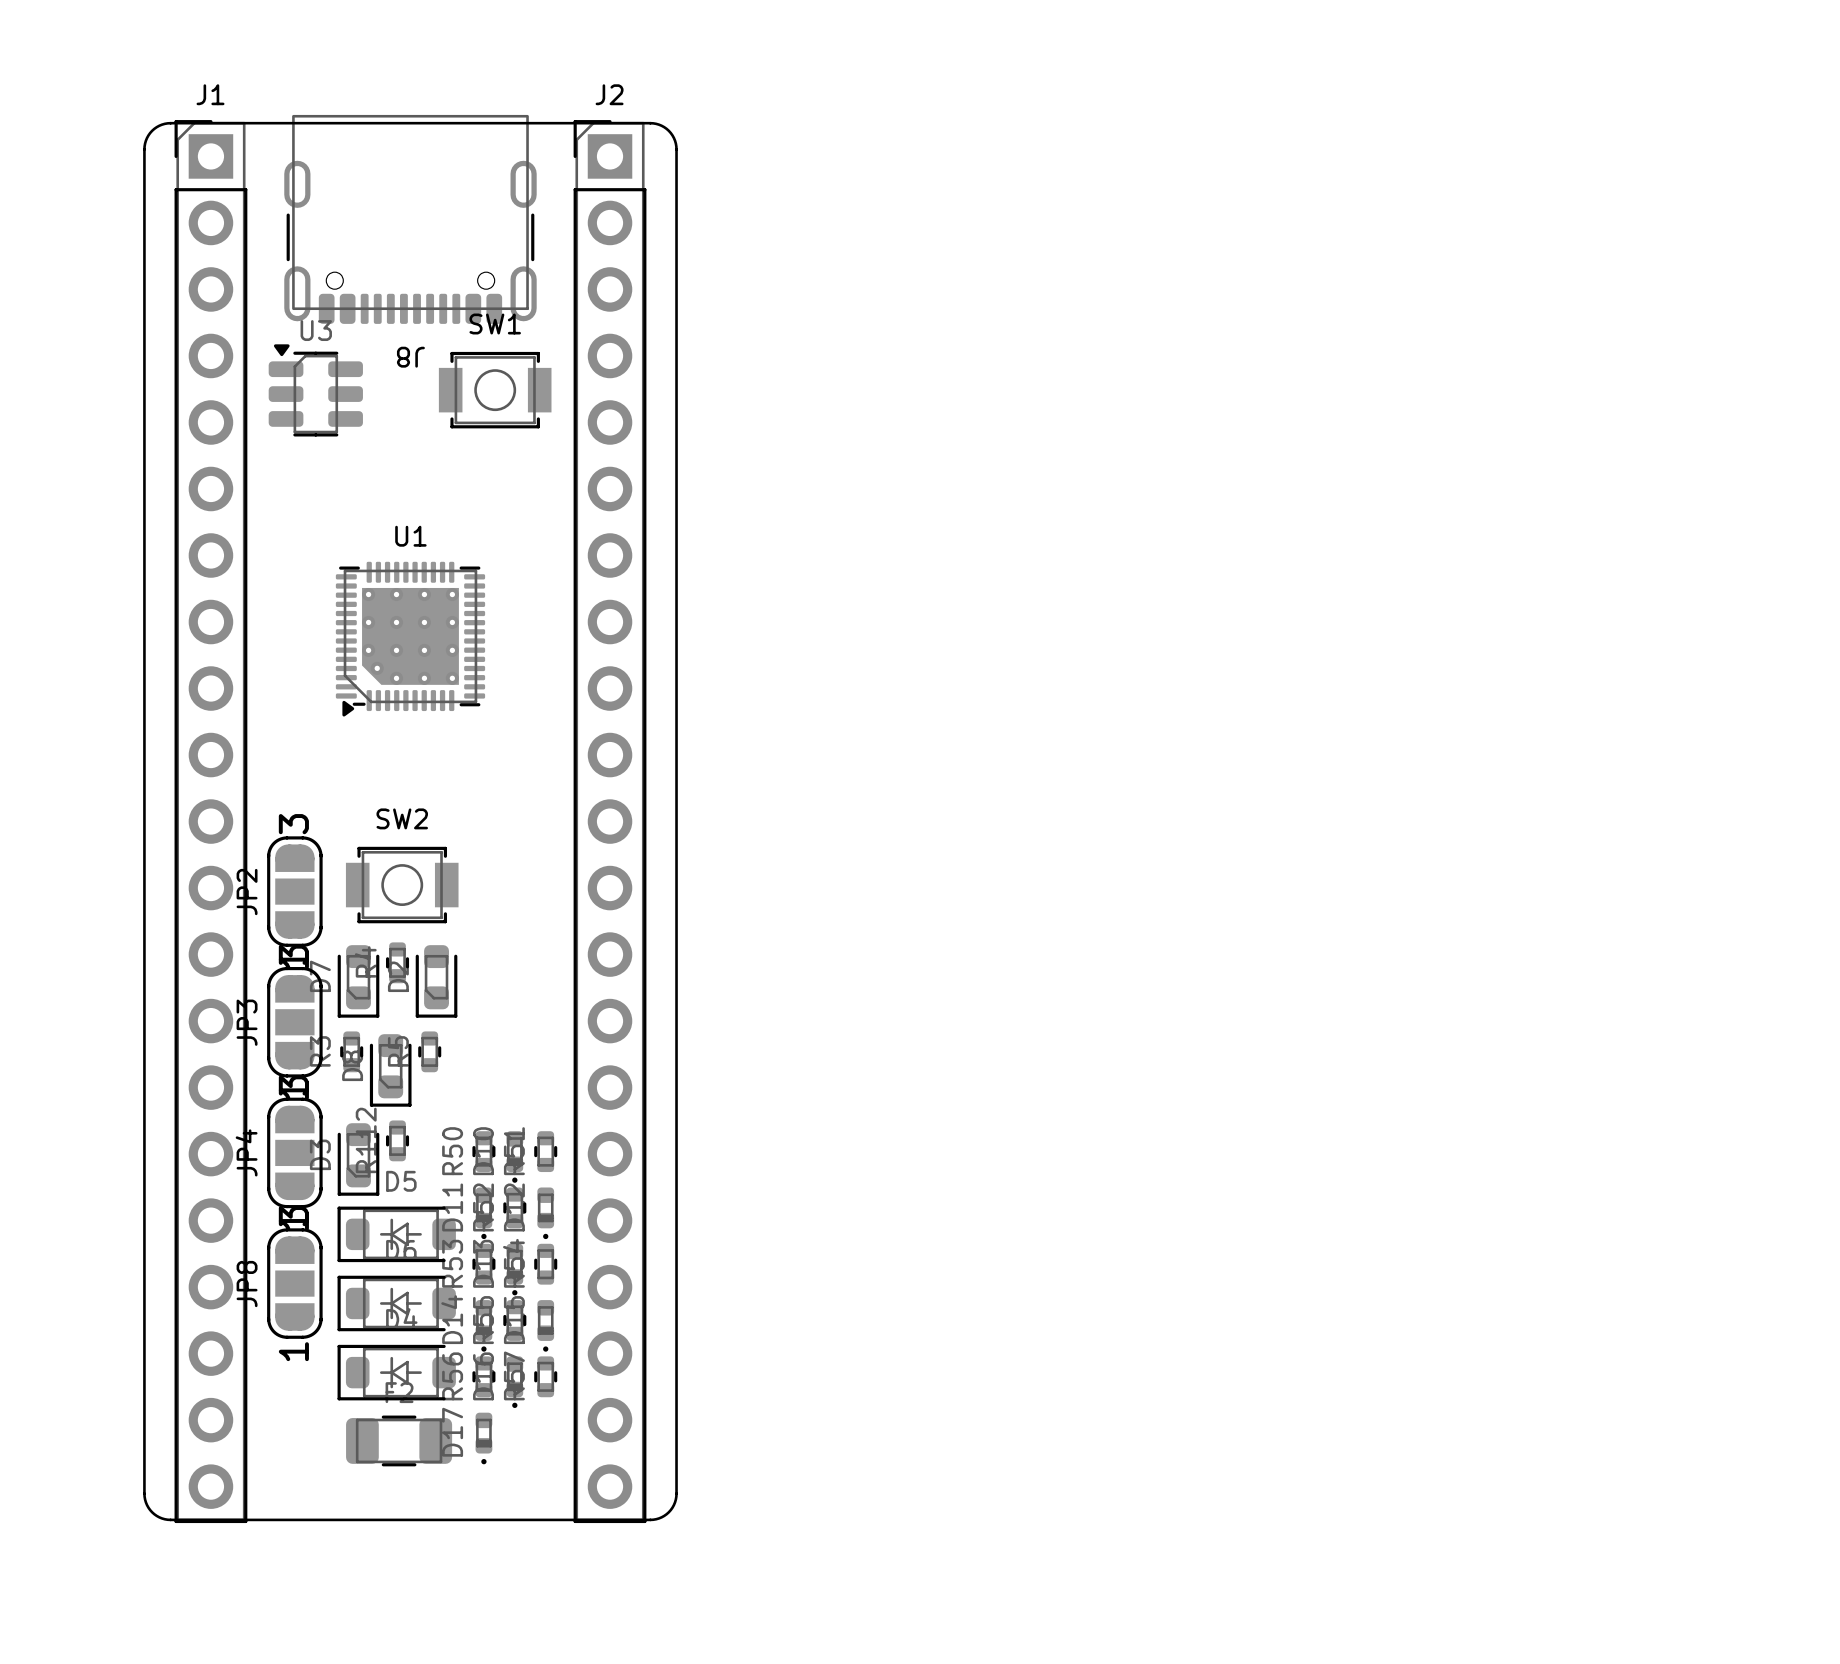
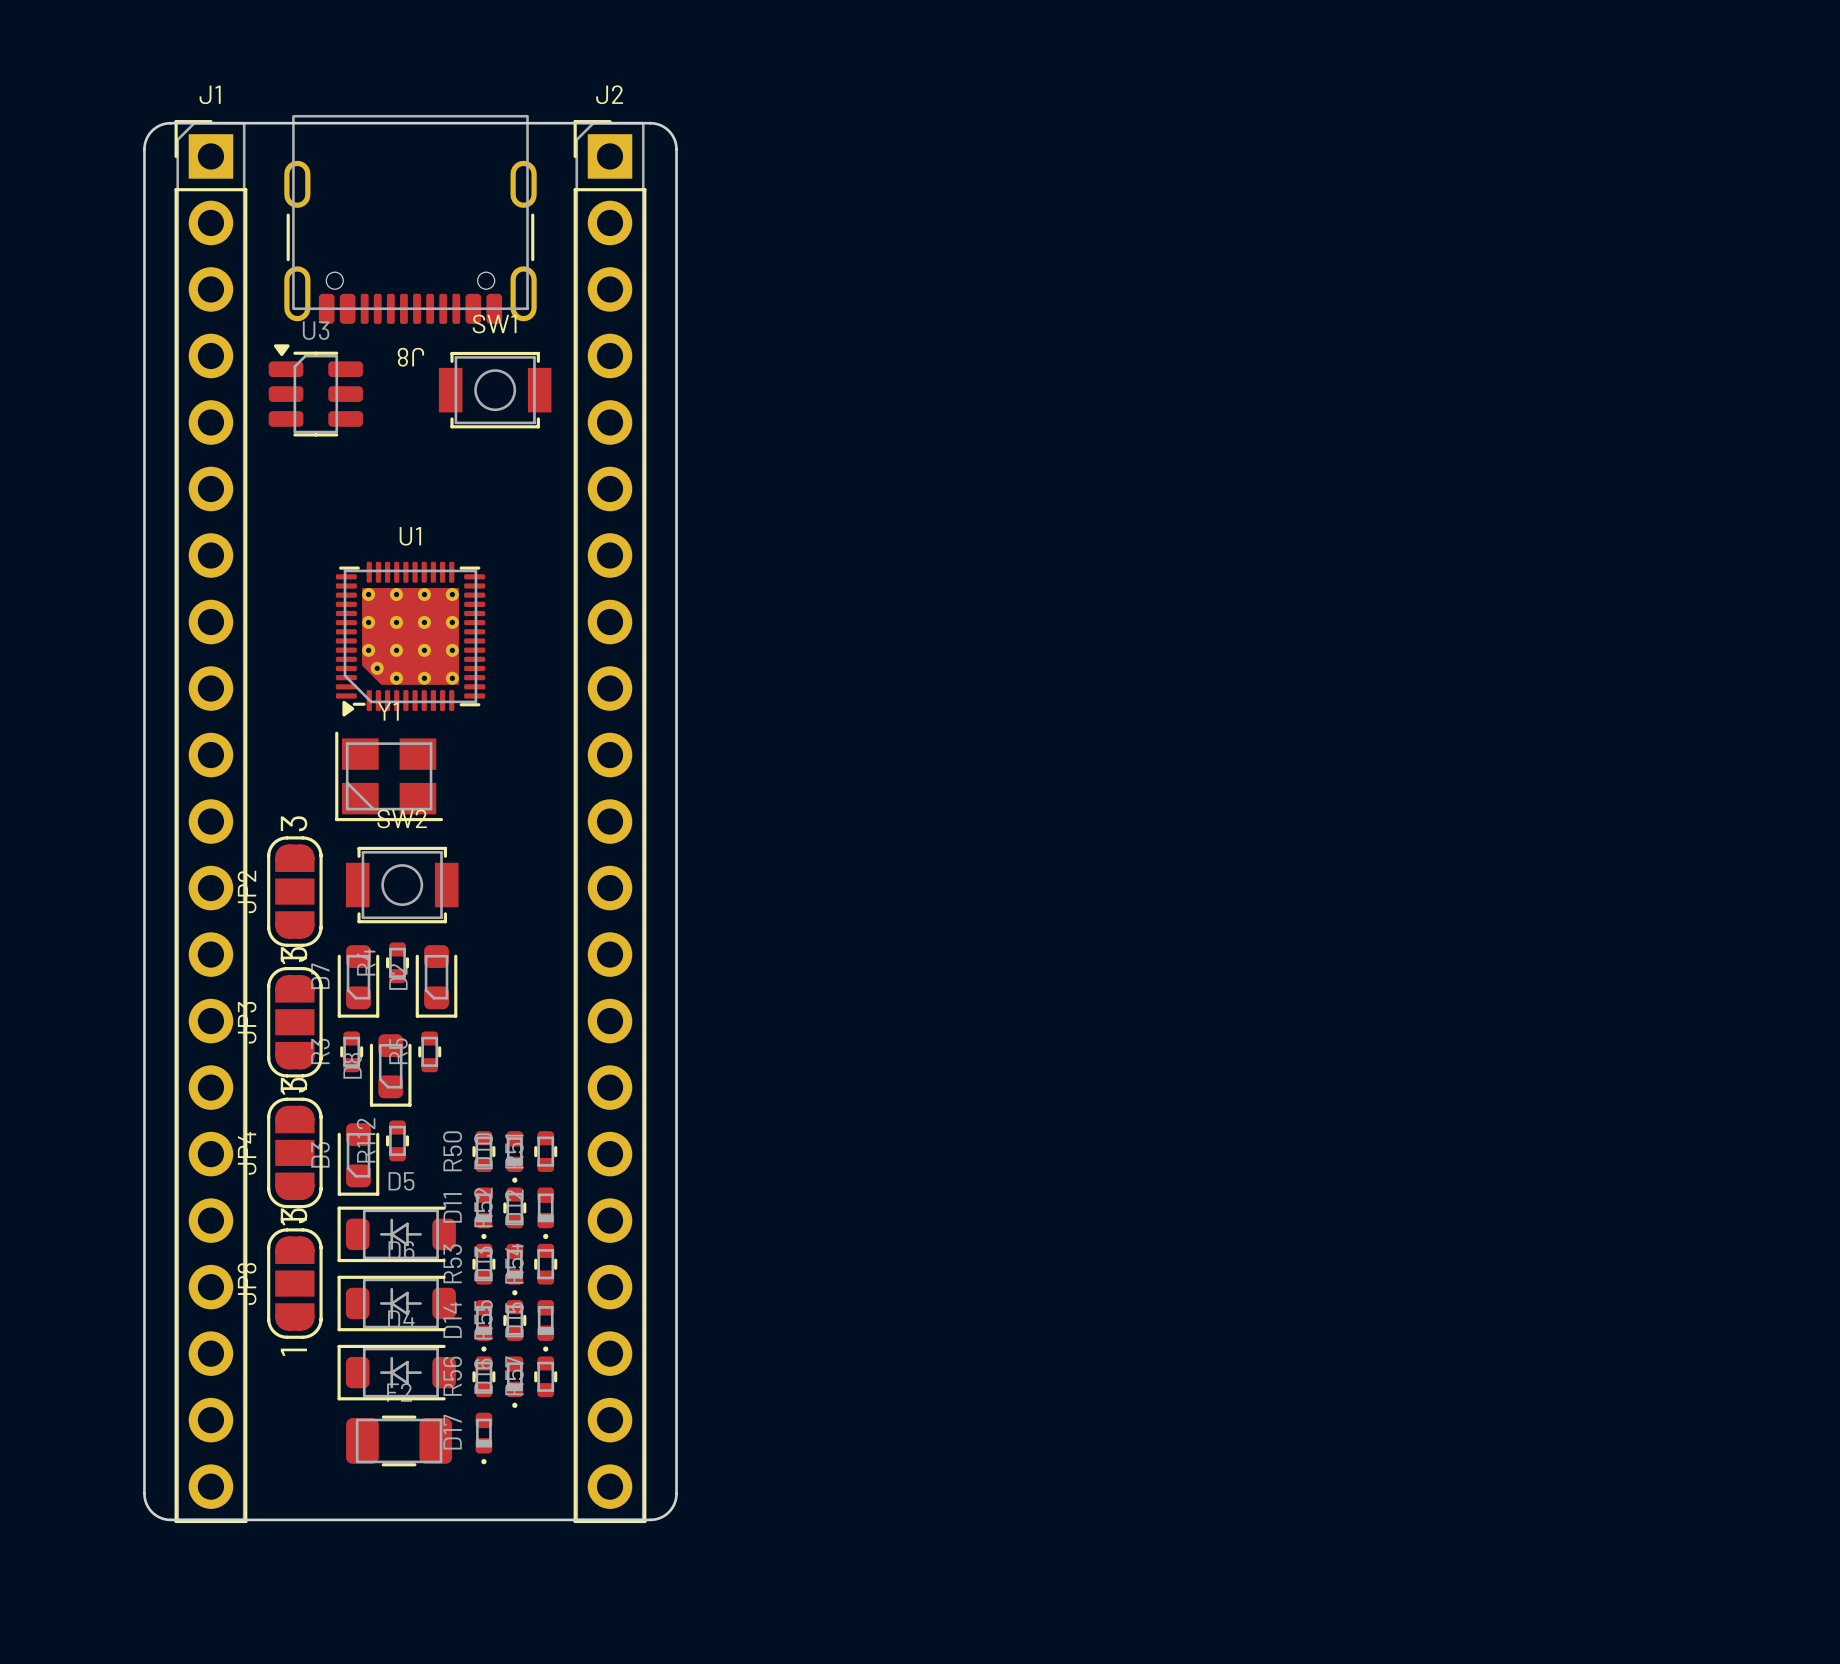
Y1: none -> (389, 776)

